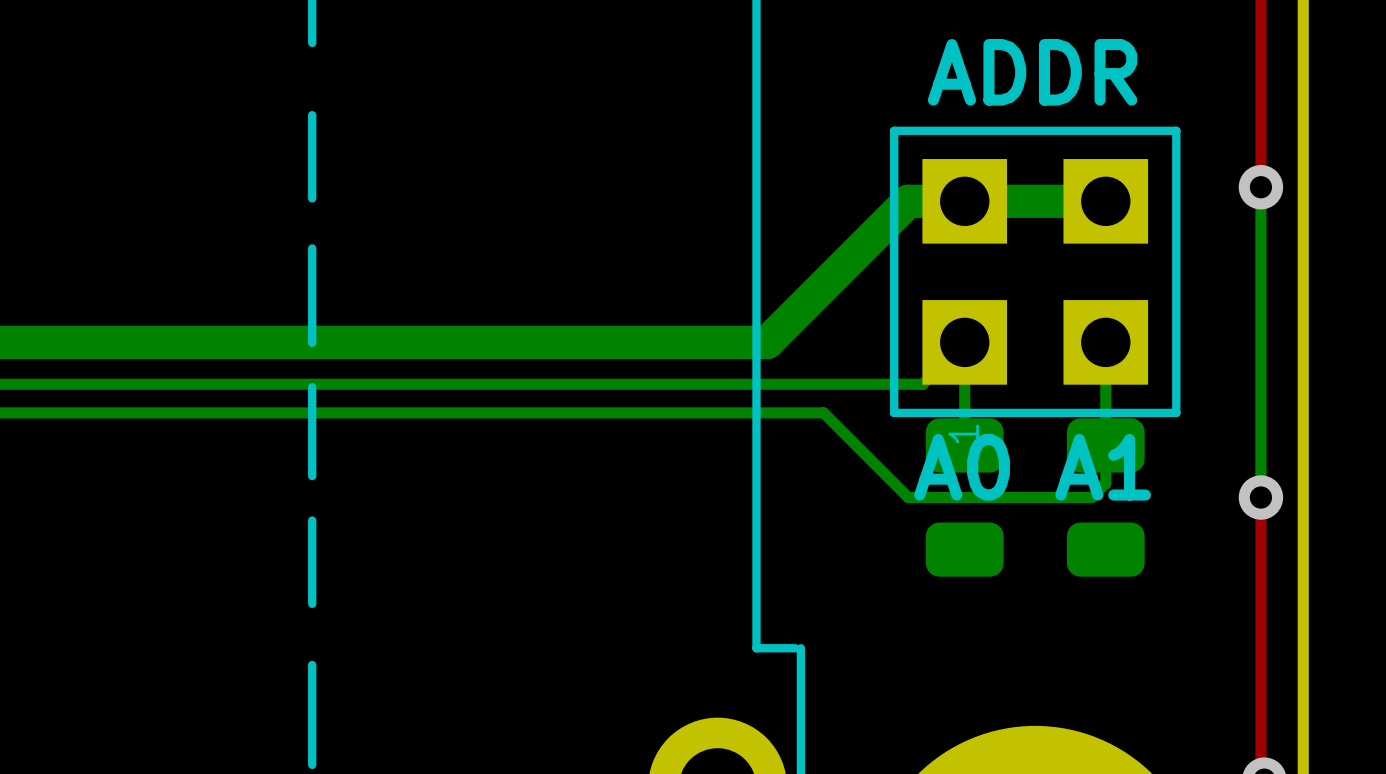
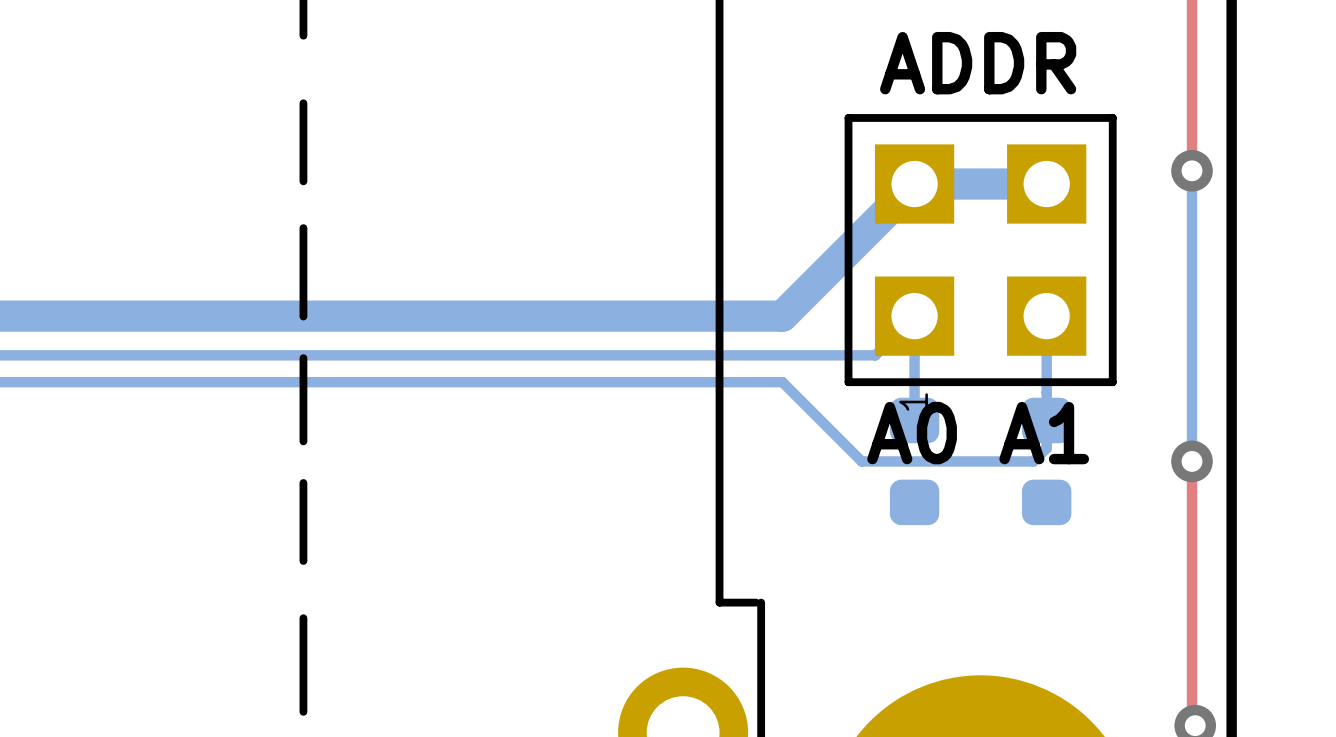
bottom track: (964, 201) (908, 201) (767, 342) -> (914, 184) (782, 316) (729, 316)
part footprint: [925, 418, 1004, 577] -> [889, 397, 940, 526]
part footprint: [1066, 418, 1145, 577] -> [1021, 397, 1072, 526]

